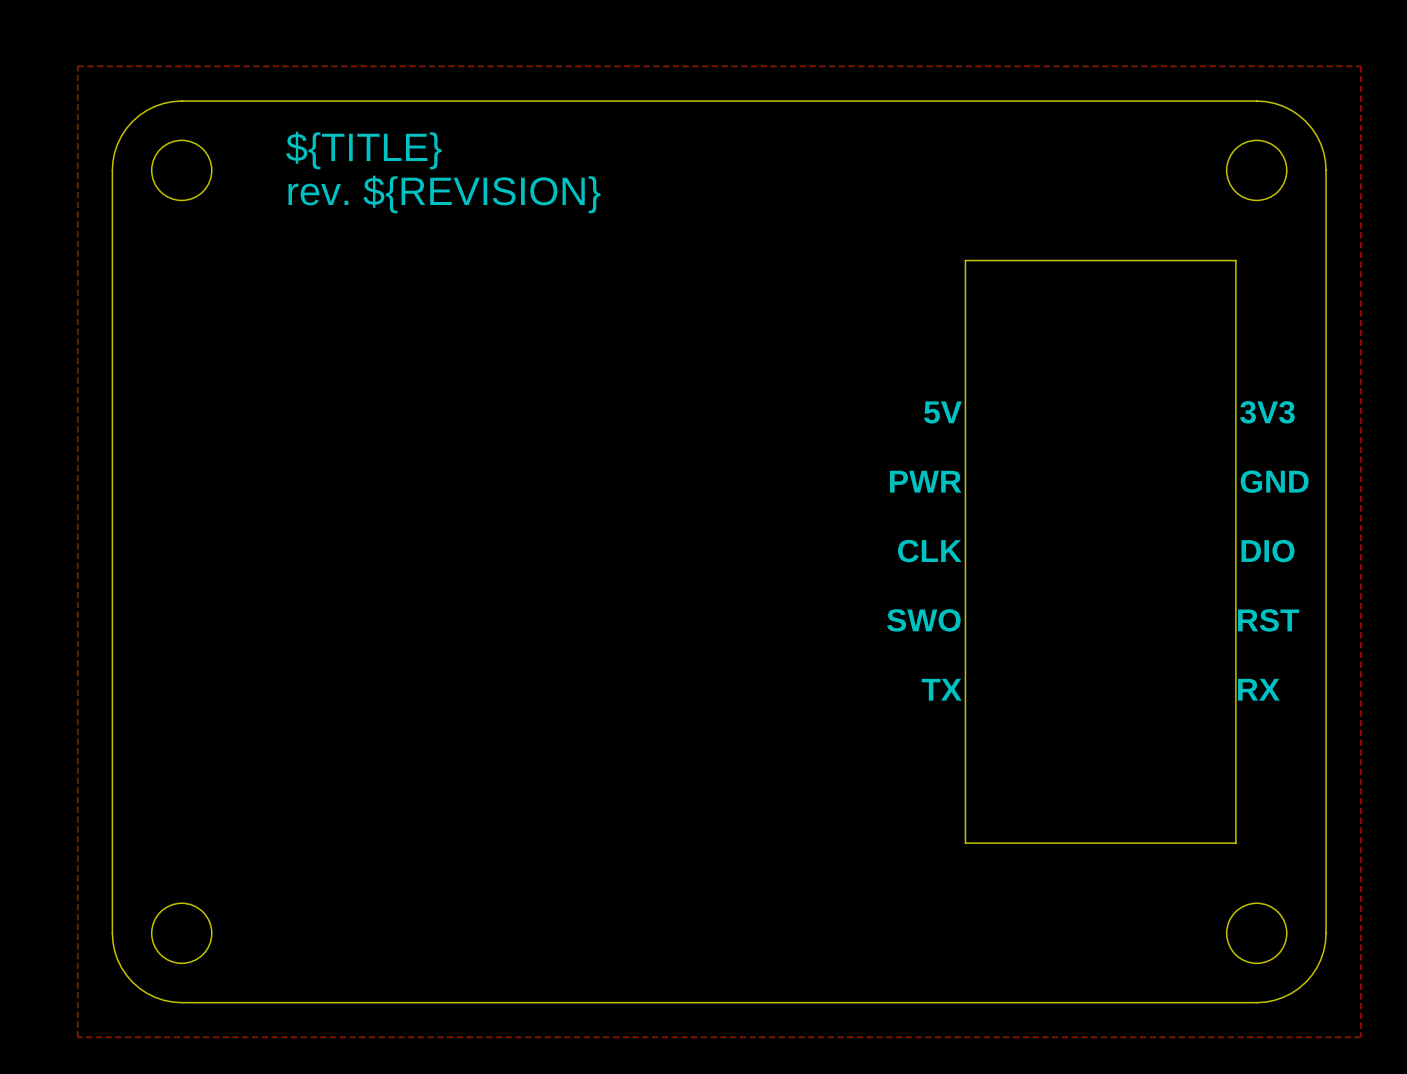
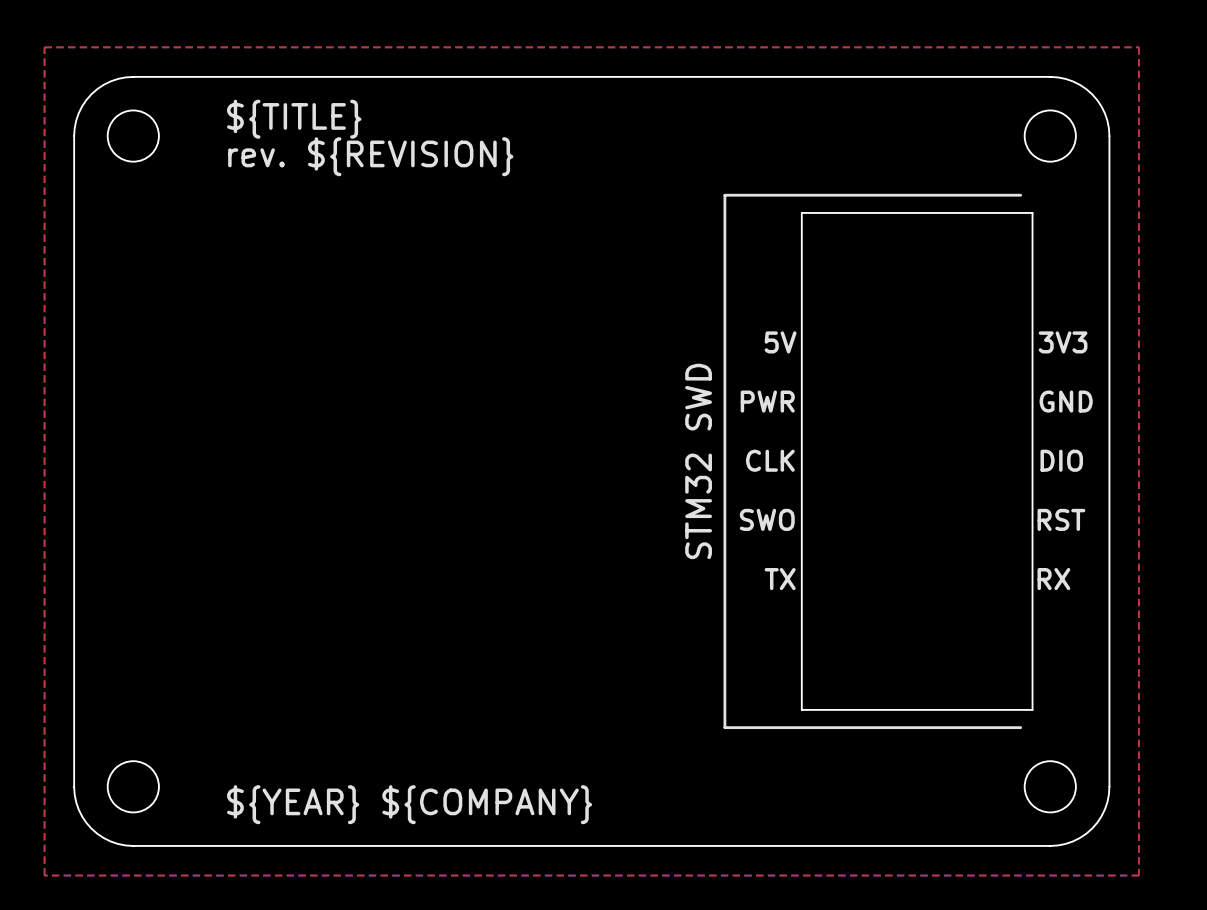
line: none -> (1020, 195) (724, 195) (724, 727) (1020, 727)
text: none -> STM32 SWD (698, 461)
text: none -> ${YEAR} ${COMPANY} (409, 804)

